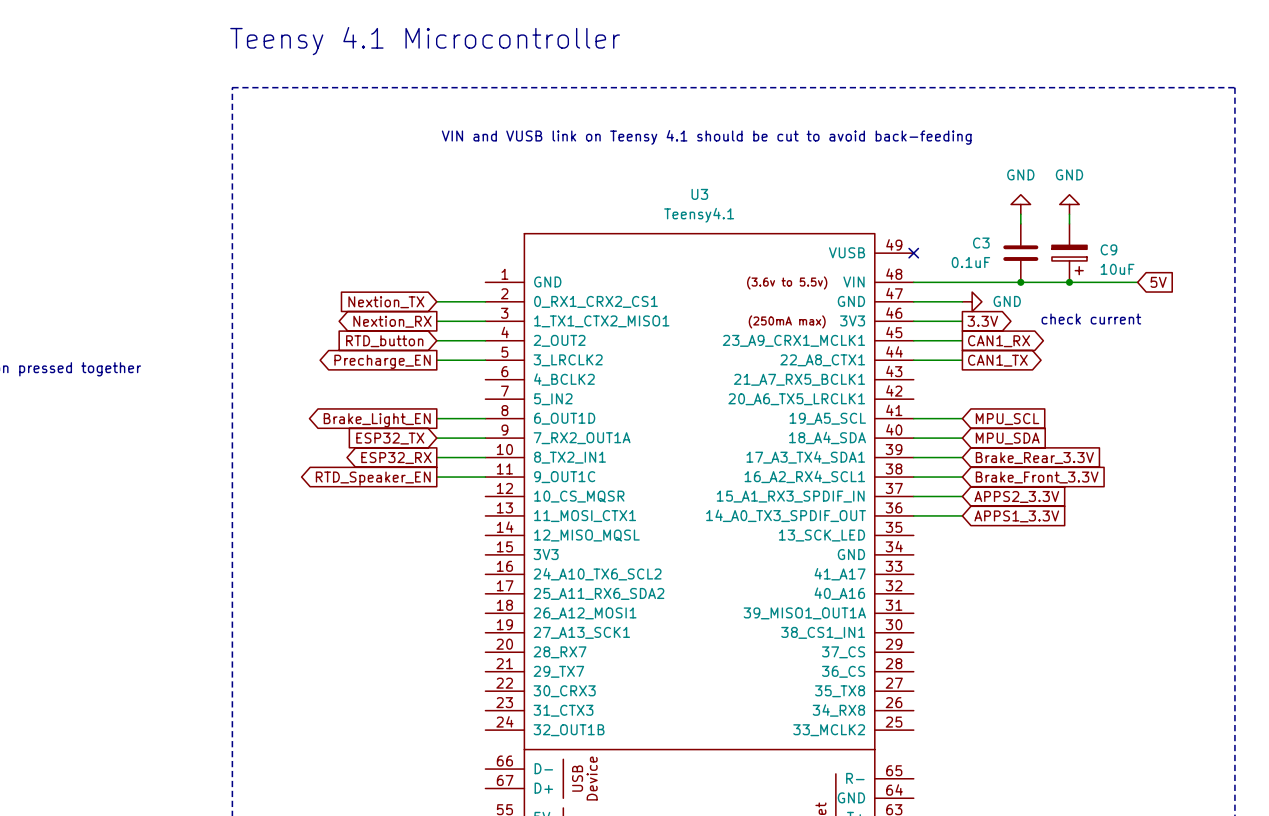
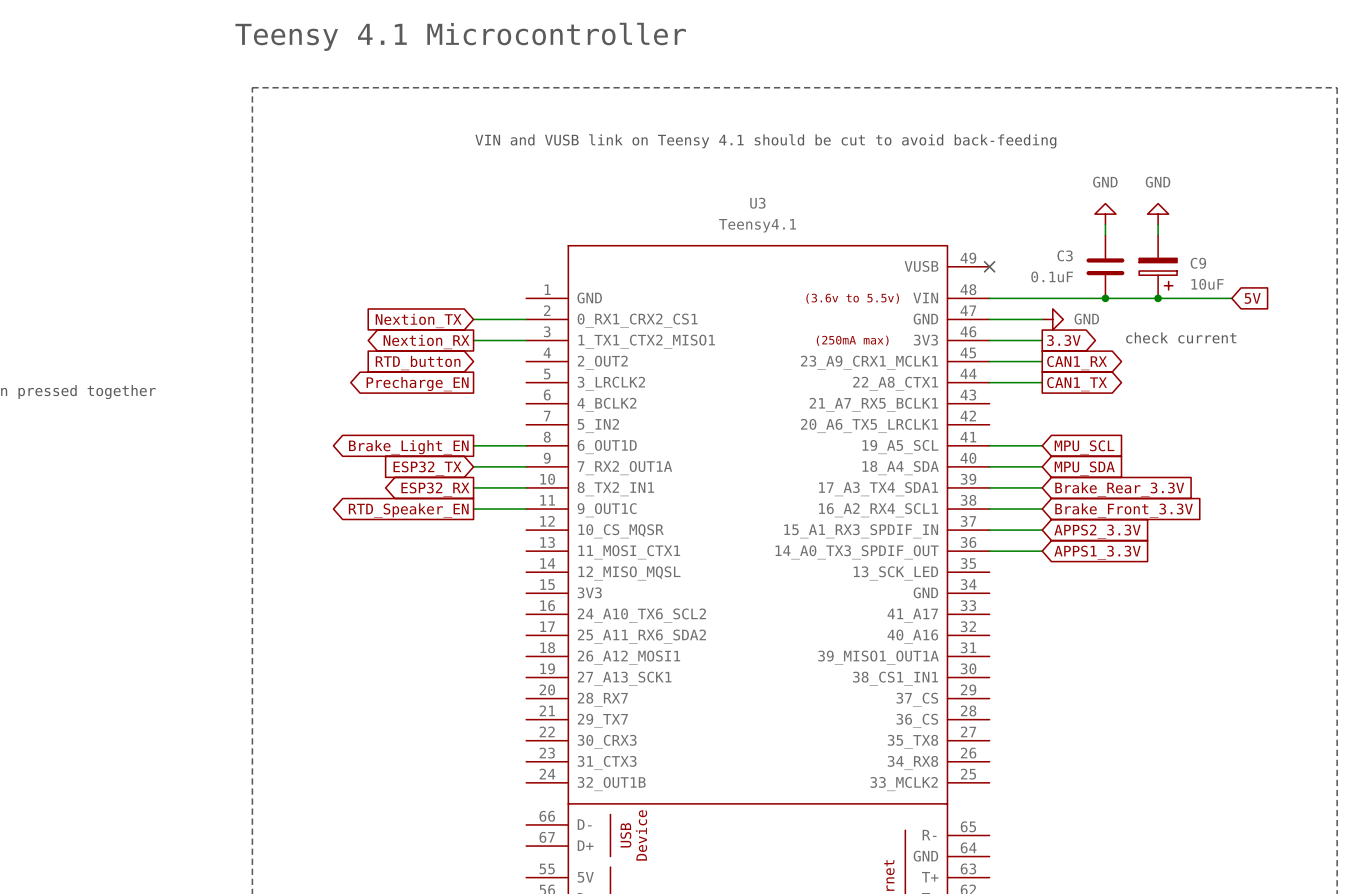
wire: (436, 340) (485, 340) -> none
wire: (436, 360) (485, 360) -> none

